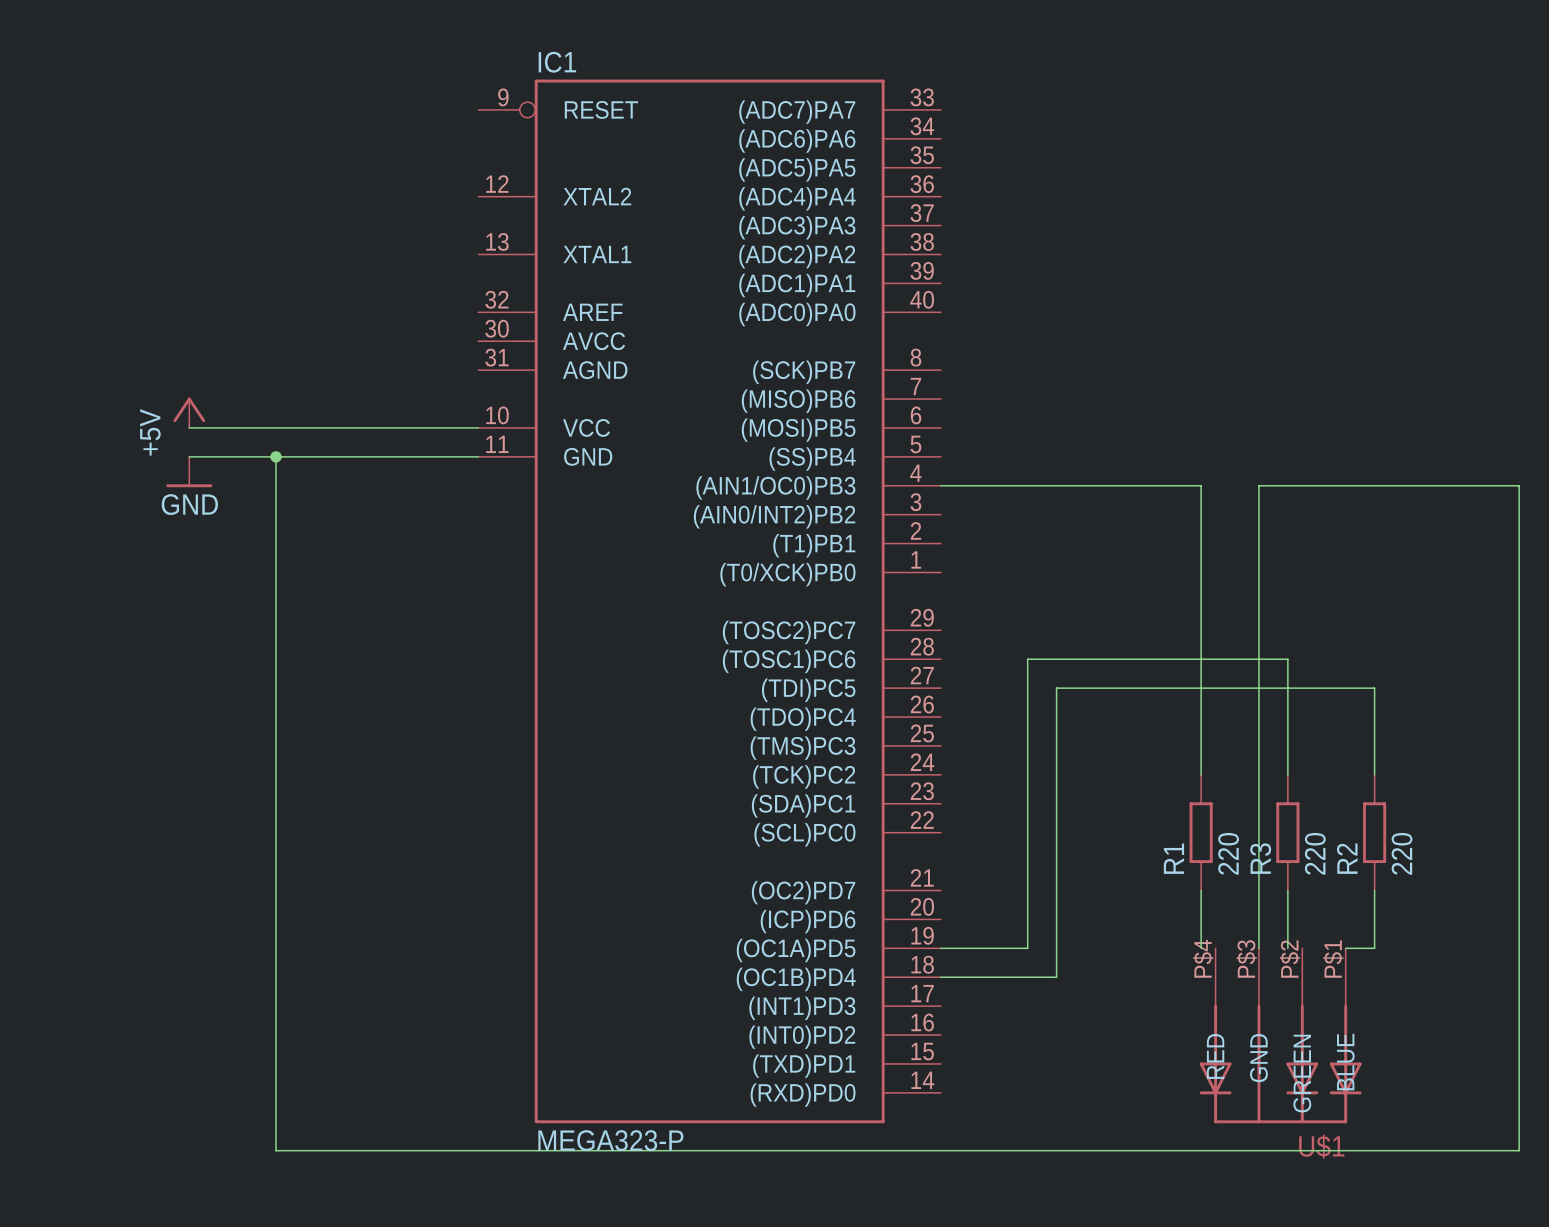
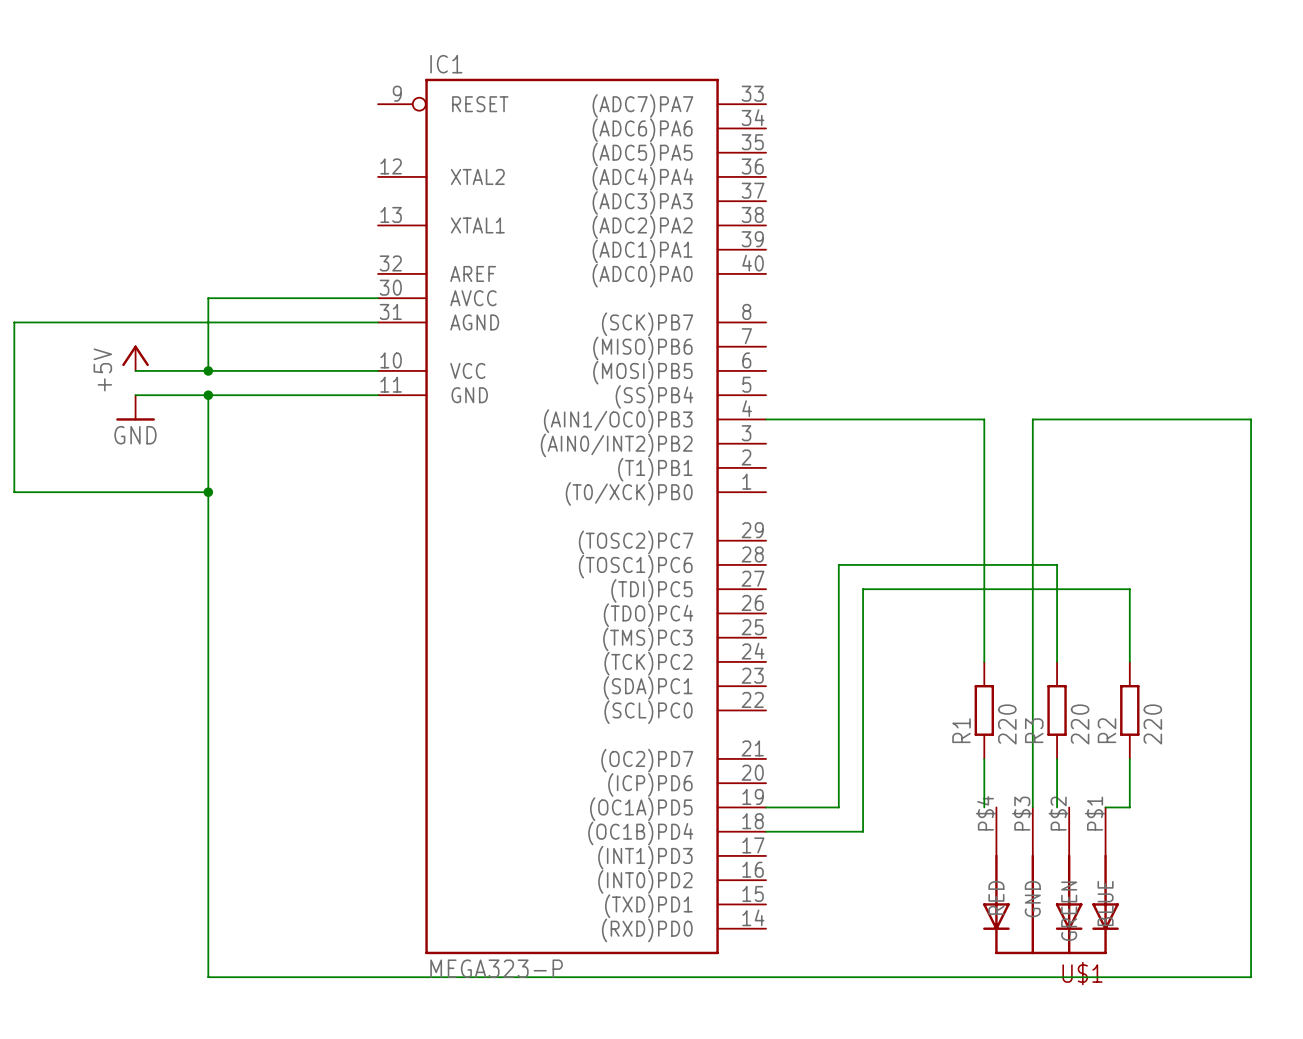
wire: none -> (378, 298) (208, 298) (208, 370)
wire: none -> (378, 322) (14, 322) (14, 492) (208, 492)
junction: none -> (208, 370)
junction: none -> (208, 492)

